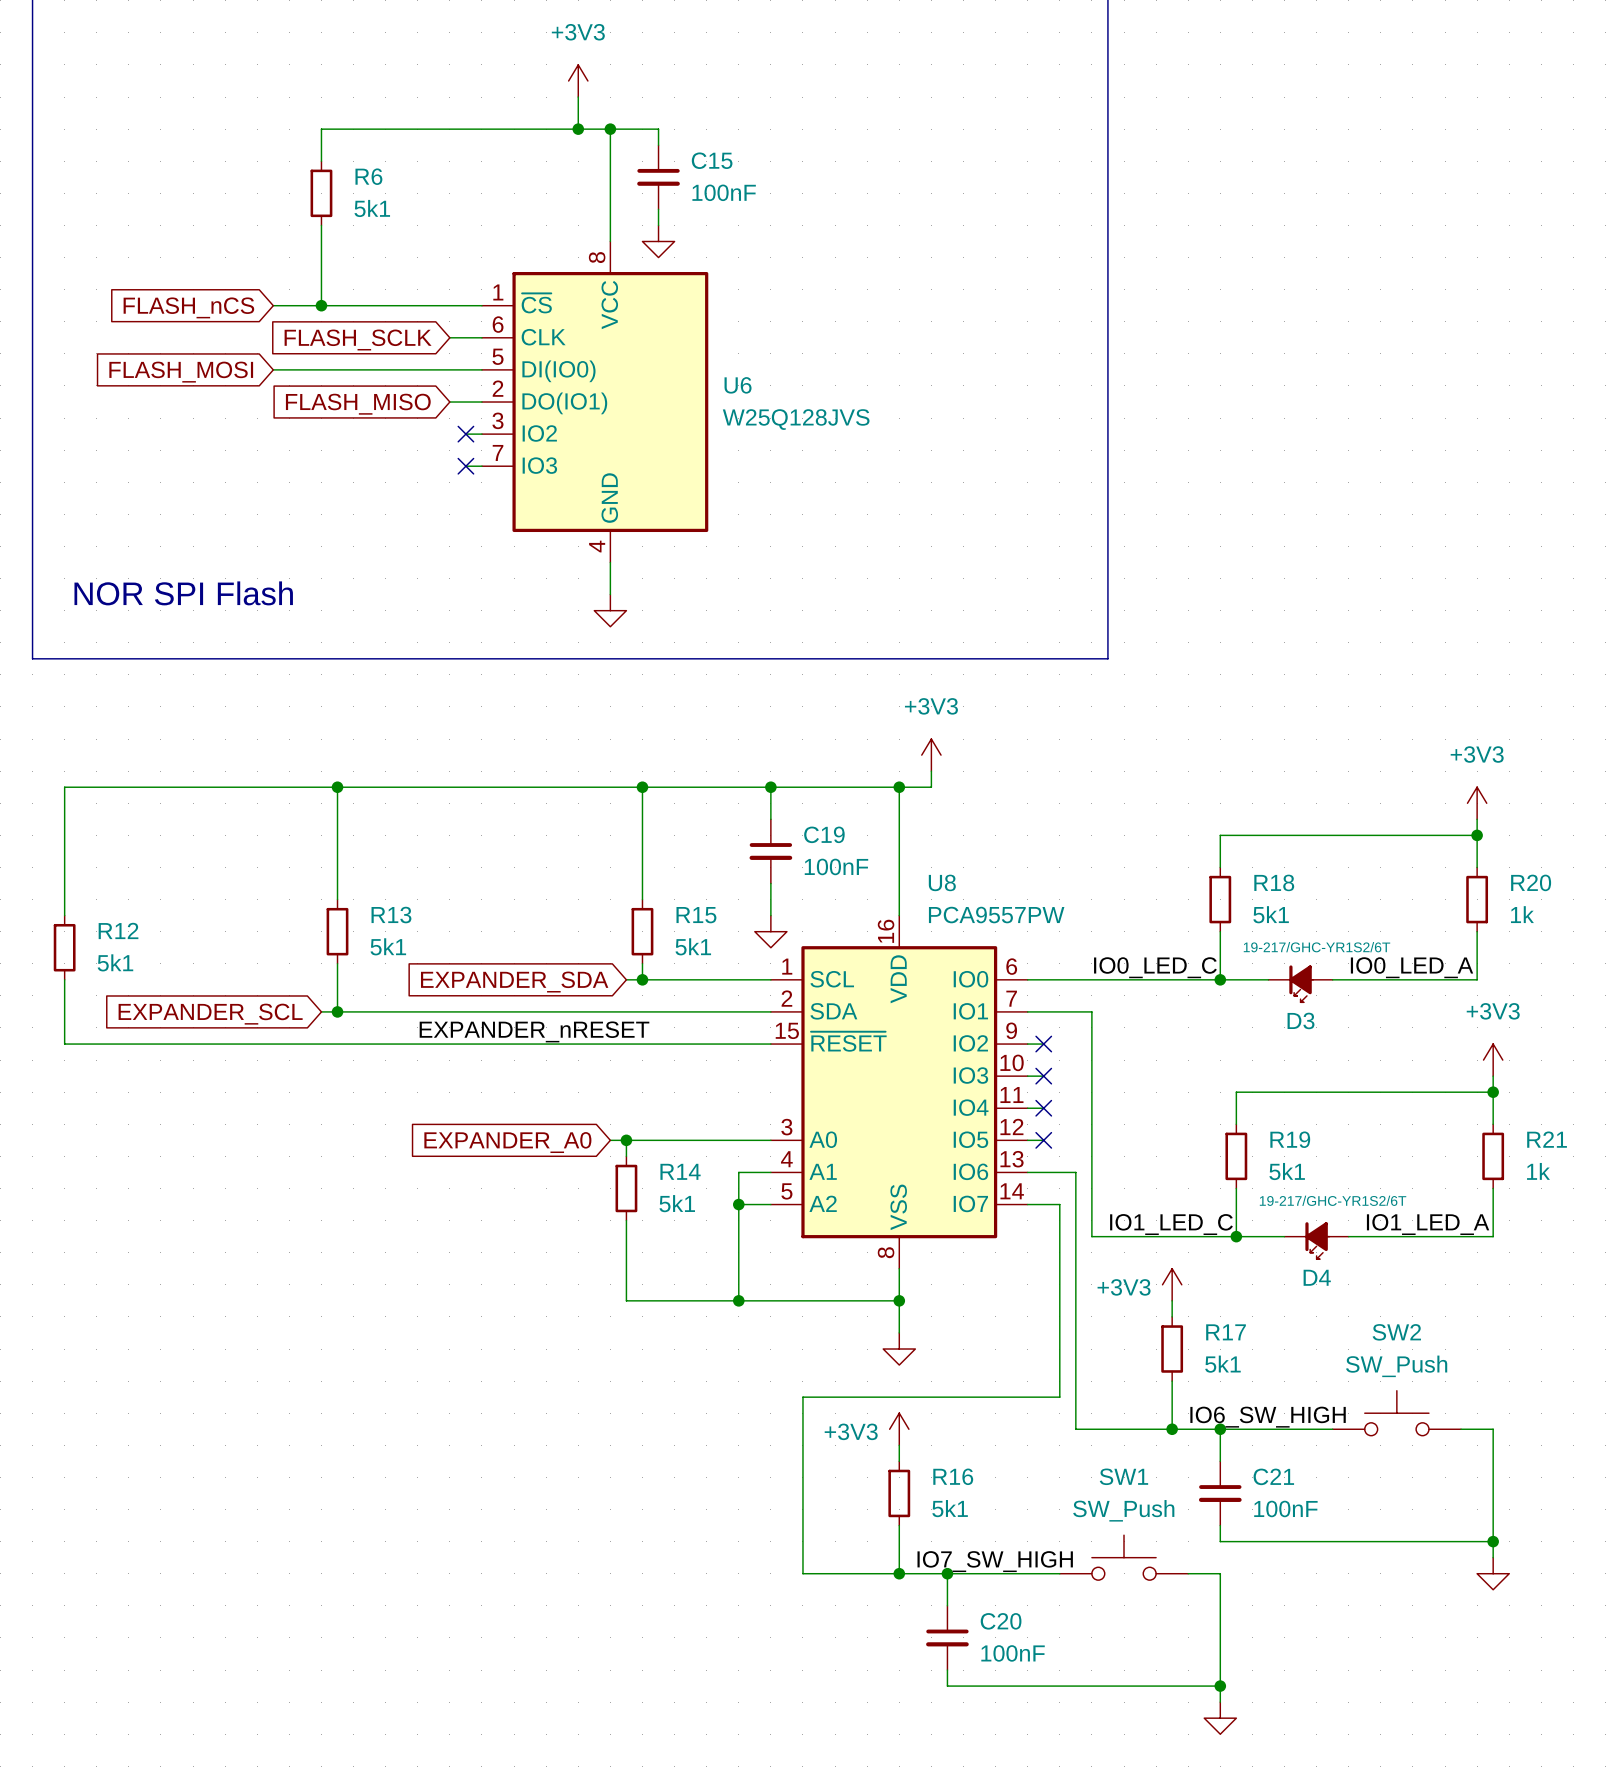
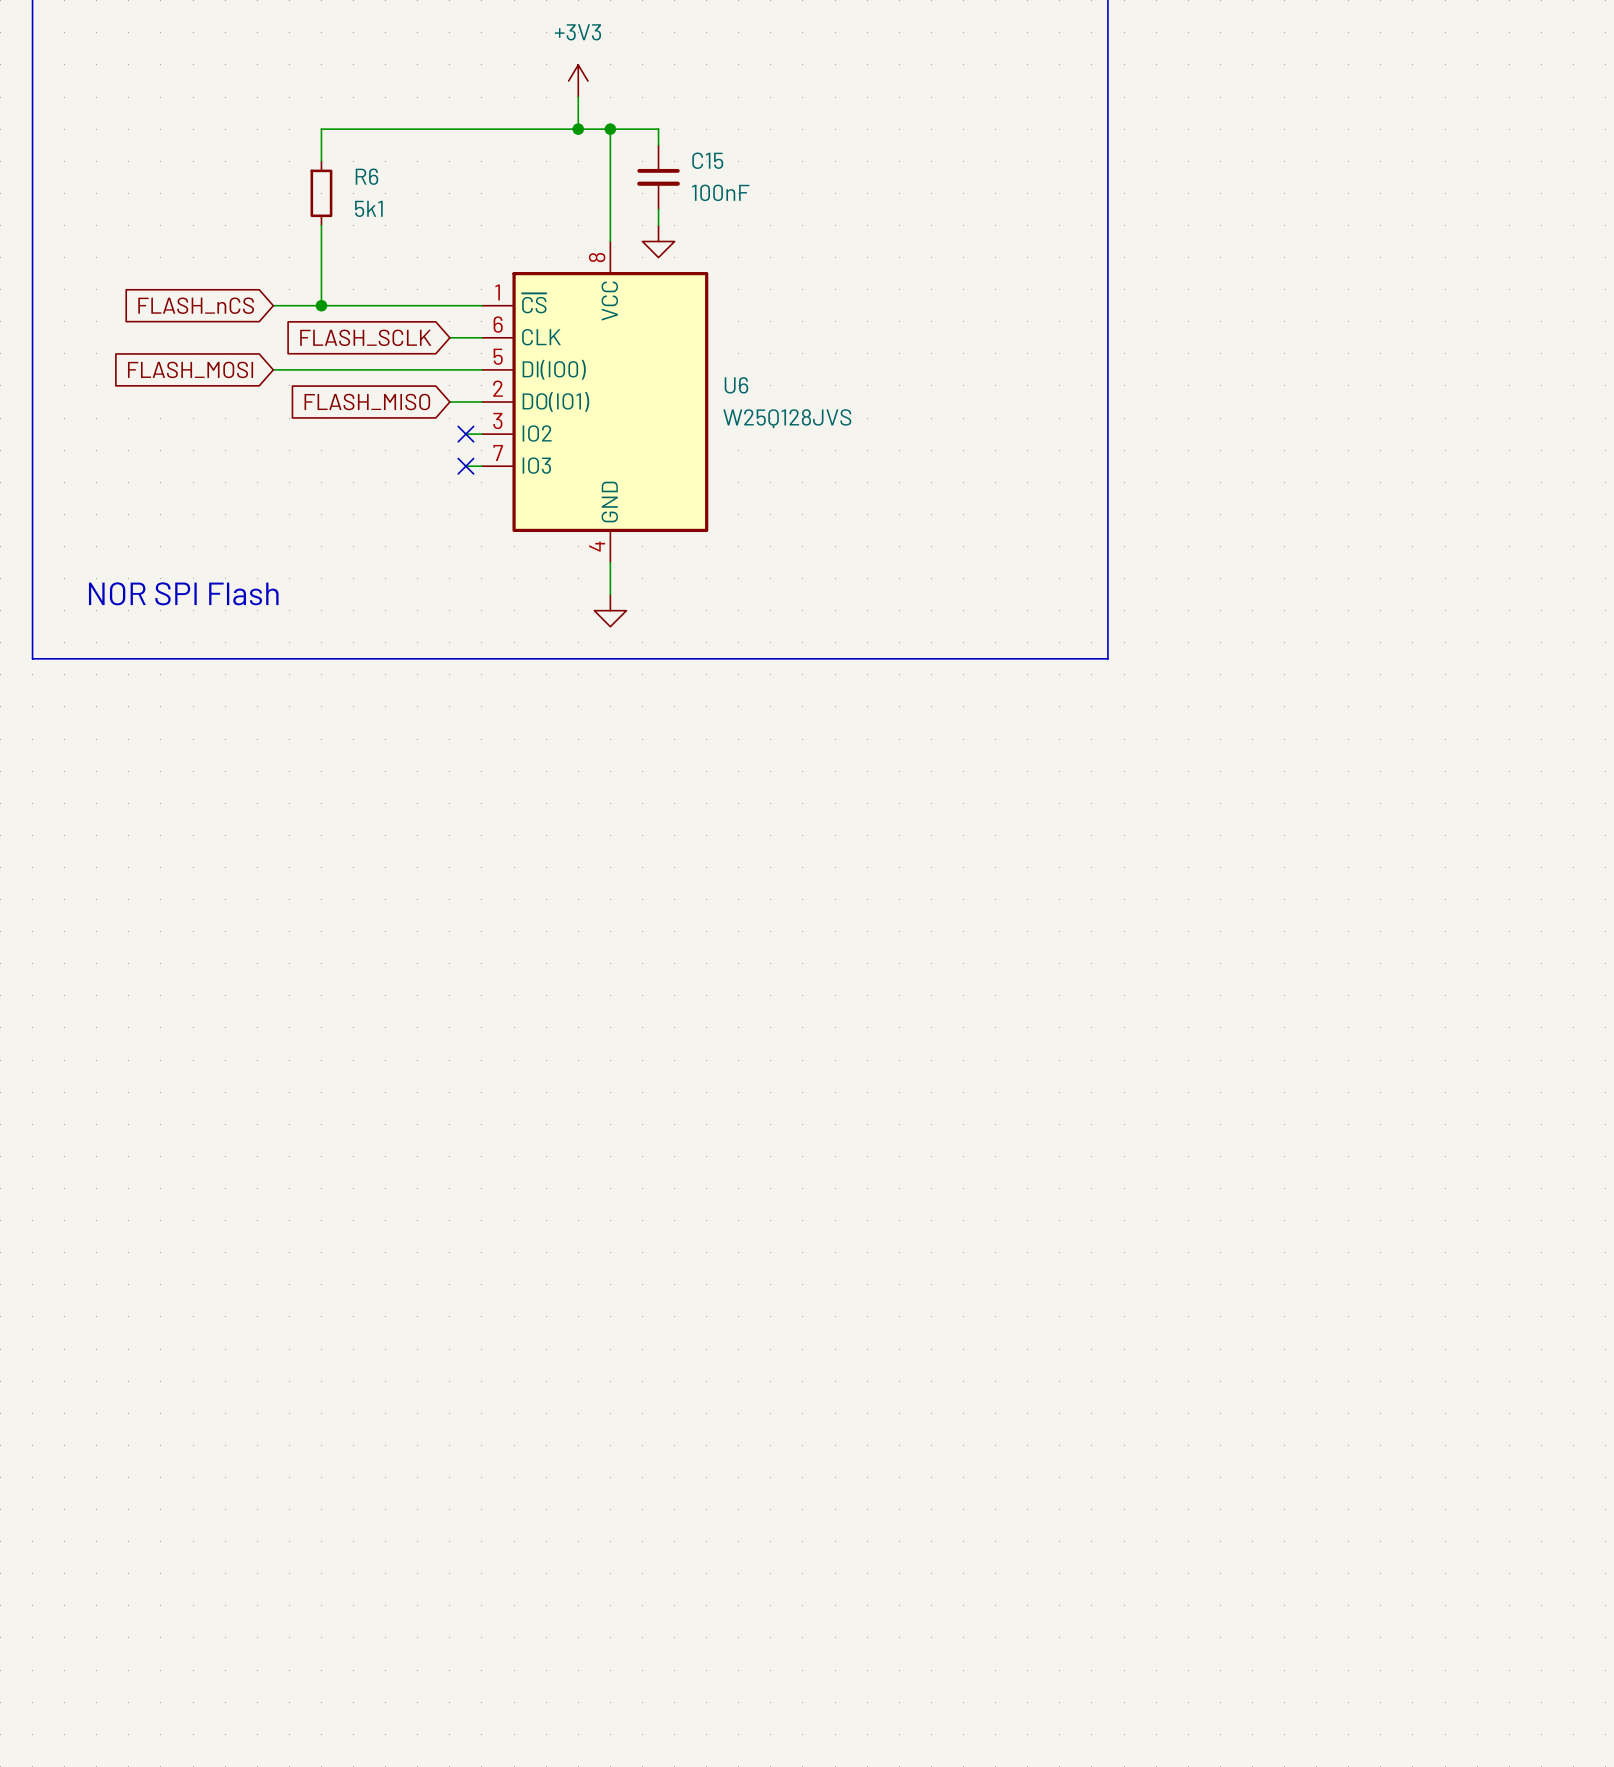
power symbol: +3V3 (931, 755) -> none
wire: (931, 771) (931, 787) (64, 787) (64, 915) -> none
wire: (337, 787) (337, 899) -> none
junction: (337, 787) -> none
wire: (642, 787) (642, 899) -> none
junction: (642, 787) -> none
wire: (770, 787) (770, 819) -> none
junction: (770, 787) -> none
wire: (899, 787) (899, 915) -> none
junction: (899, 787) -> none
power symbol: +3V3 (1477, 803) -> none
wire: (1477, 819) (1477, 867) -> none
wire: (1477, 835) (1220, 835) (1220, 867) -> none
junction: (1477, 835) -> none
C19: 100nF (770, 851) -> none
wire: (770, 883) (770, 915) -> none
R18: 5k1 (1220, 899) -> none
R20: 1k (1477, 899) -> none
R13: 5k1 (337, 931) -> none
R15: 5k1 (642, 931) -> none
power symbol: (770, 931) -> none
wire: (1220, 931) (1220, 979) -> none
wire: (1477, 931) (1477, 979) (1332, 979) -> none
R12: 5k1 (64, 947) -> none
wire: (337, 963) (337, 1011) -> none
wire: (642, 963) (642, 979) -> none
label: IO0_LED_C (1155, 967) -> none
label: IO0_LED_A (1412, 967) -> none
wire: (64, 979) (64, 1044) (770, 1044) -> none
wire: (626, 979) (770, 979) -> none
junction: (642, 979) -> none
wire: (1027, 979) (1268, 979) -> none
junction: (1220, 979) -> none
global label: EXPANDER_SDA (514, 982) -> none
D3: 19-217/GHC-YR1S2/6T (1300, 983) -> none
wire: (321, 1011) (770, 1011) -> none
junction: (337, 1011) -> none
wire: (1027, 1011) (1091, 1011) (1091, 1236) (1284, 1236) -> none
global label: EXPANDER_SCL (210, 1014) -> none
label: EXPANDER_nRESET (534, 1031) -> none
wire: (1027, 1044) (1043, 1044) -> none
no-connect mark: (1043, 1044) -> none
power symbol: +3V3 (1493, 1060) -> none
wire: (1027, 1076) (1043, 1076) -> none
no-connect mark: (1043, 1076) -> none
wire: (1493, 1076) (1493, 1124) -> none
U8: PCA9557PW (899, 1092) -> none
wire: (1493, 1092) (1236, 1092) (1236, 1124) -> none
junction: (1493, 1092) -> none
wire: (1027, 1108) (1043, 1108) -> none
no-connect mark: (1043, 1108) -> none
wire: (610, 1140) (770, 1140) -> none
wire: (626, 1140) (626, 1156) -> none
junction: (626, 1140) -> none
wire: (1027, 1140) (1043, 1140) -> none
no-connect mark: (1043, 1140) -> none
global label: EXPANDER_A0 (507, 1142) -> none
R19: 5k1 (1236, 1156) -> none
R21: 1k (1493, 1156) -> none
wire: (770, 1172) (738, 1172) (738, 1300) -> none
wire: (1027, 1172) (1075, 1172) (1075, 1429) (1332, 1429) -> none
R14: 5k1 (626, 1188) -> none
wire: (1236, 1188) (1236, 1236) -> none
wire: (1493, 1188) (1493, 1236) (1348, 1236) -> none
wire: (738, 1204) (770, 1204) -> none
junction: (738, 1204) -> none
wire: (1027, 1204) (1059, 1204) (1059, 1397) (802, 1397) (802, 1573) (1059, 1573) -> none
wire: (626, 1220) (626, 1300) (899, 1300) -> none
label: IO1_LED_C (1171, 1224) -> none
label: IO1_LED_A (1428, 1224) -> none
junction: (1236, 1236) -> none
D4: 19-217/GHC-YR1S2/6T (1316, 1240) -> none
wire: (899, 1268) (899, 1332) -> none
power symbol: +3V3 (1172, 1284) -> none
junction: (738, 1300) -> none
junction: (899, 1300) -> none
wire: (1172, 1300) (1172, 1316) -> none
power symbol: (899, 1349) -> none
R17: 5k1 (1172, 1349) -> none
wire: (1172, 1381) (1172, 1429) -> none
SW2: SW_Push (1396, 1413) -> none
label: IO6_SW_HIGH (1268, 1417) -> none
power symbol: +3V3 (899, 1429) -> none
junction: (1172, 1429) -> none
wire: (1220, 1429) (1220, 1461) -> none
junction: (1220, 1429) -> none
wire: (1461, 1429) (1493, 1429) (1493, 1557) -> none
wire: (899, 1445) (899, 1461) -> none
R16: 5k1 (899, 1493) -> none
C21: 100nF (1220, 1493) -> none
wire: (899, 1525) (899, 1573) -> none
wire: (1220, 1525) (1220, 1541) (1493, 1541) -> none
junction: (1493, 1541) -> none
SW1: SW_Push (1124, 1557) -> none
label: IO7_SW_HIGH (995, 1561) -> none
junction: (899, 1573) -> none
wire: (947, 1573) (947, 1605) -> none
junction: (947, 1573) -> none
wire: (1188, 1573) (1220, 1573) (1220, 1702) -> none
power symbol: (1493, 1573) -> none
C20: 100nF (947, 1637) -> none
wire: (947, 1670) (947, 1686) (1220, 1686) -> none
junction: (1220, 1686) -> none
power symbol: (1220, 1718) -> none

